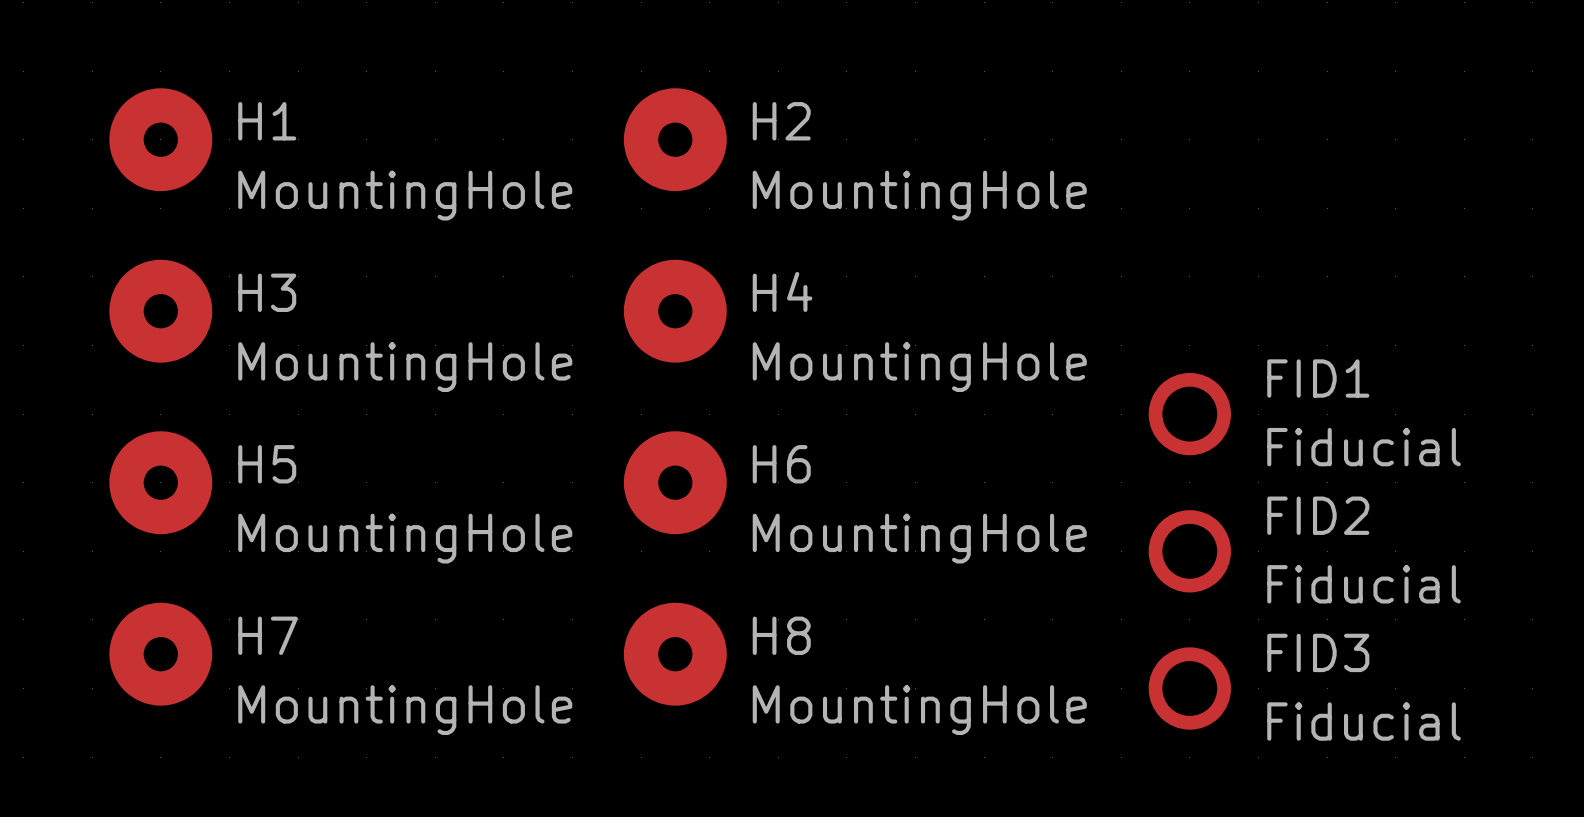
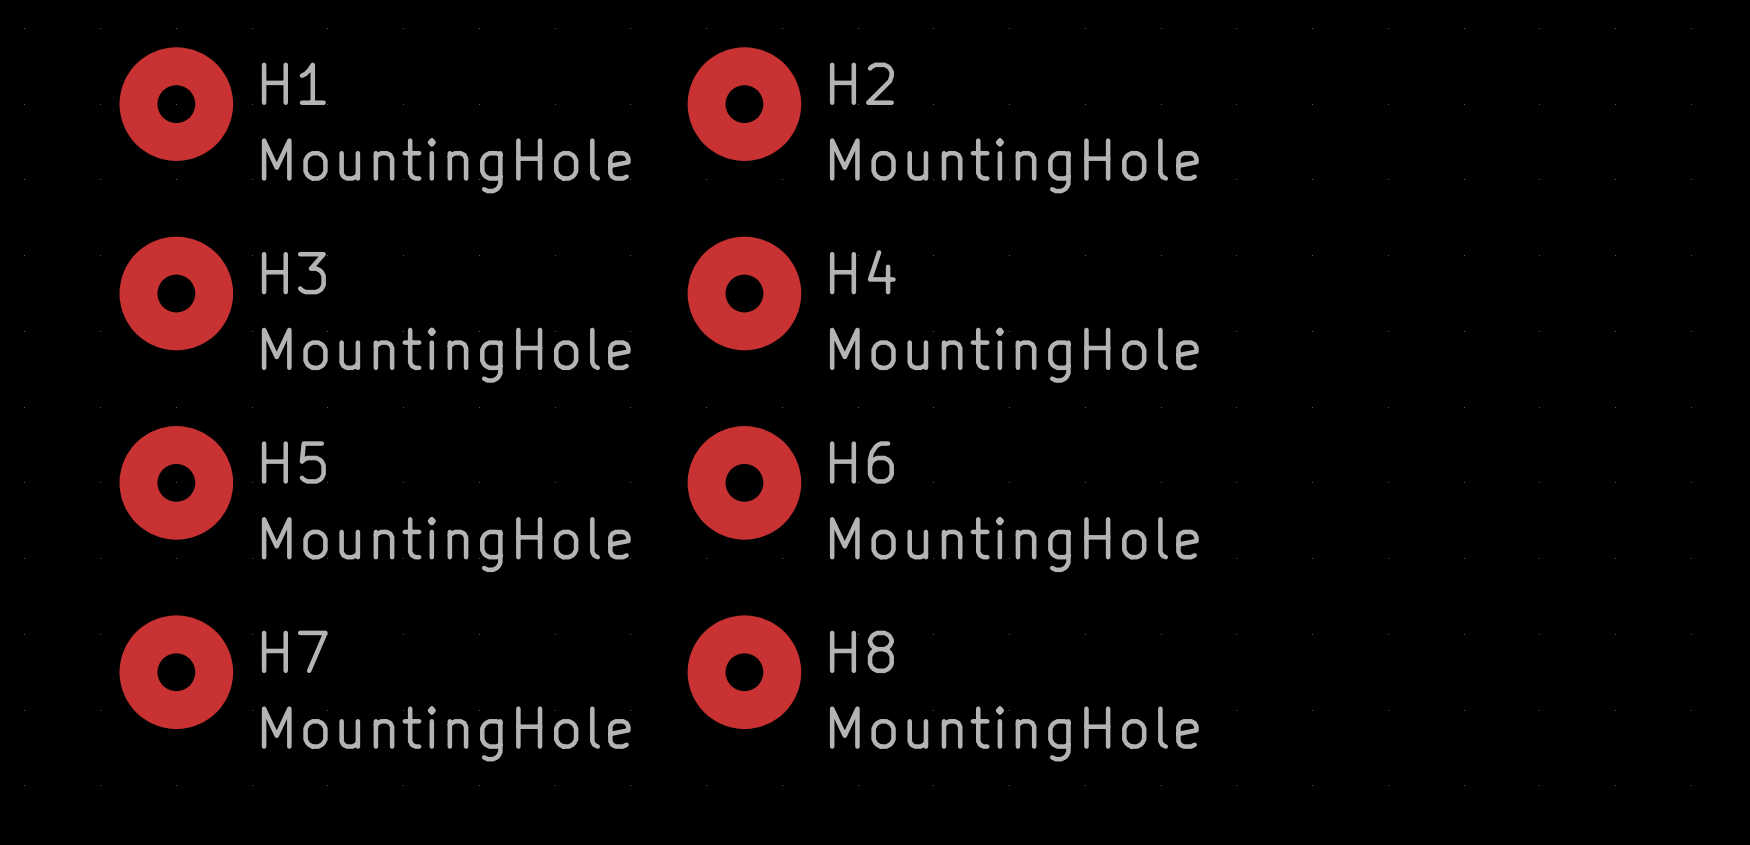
FID1: Fiducial (1189, 414) -> none
FID2: Fiducial (1189, 551) -> none
FID3: Fiducial (1189, 688) -> none

